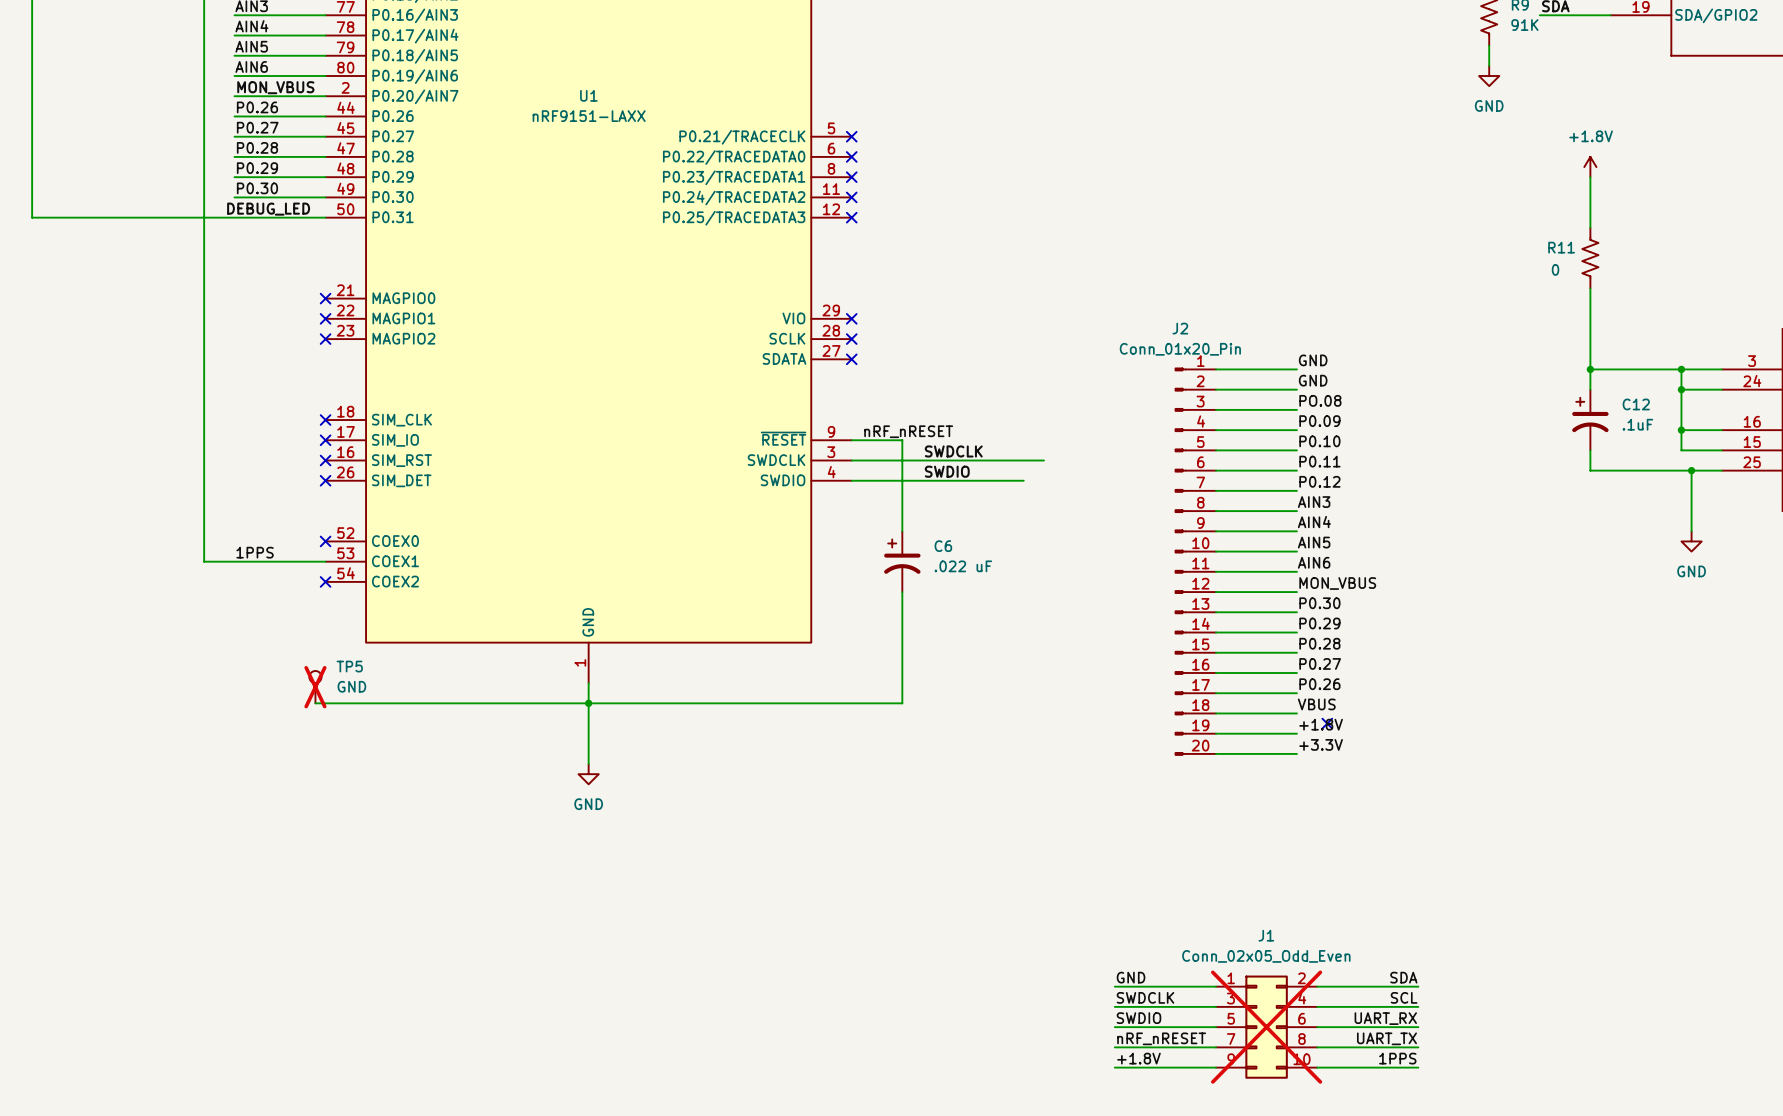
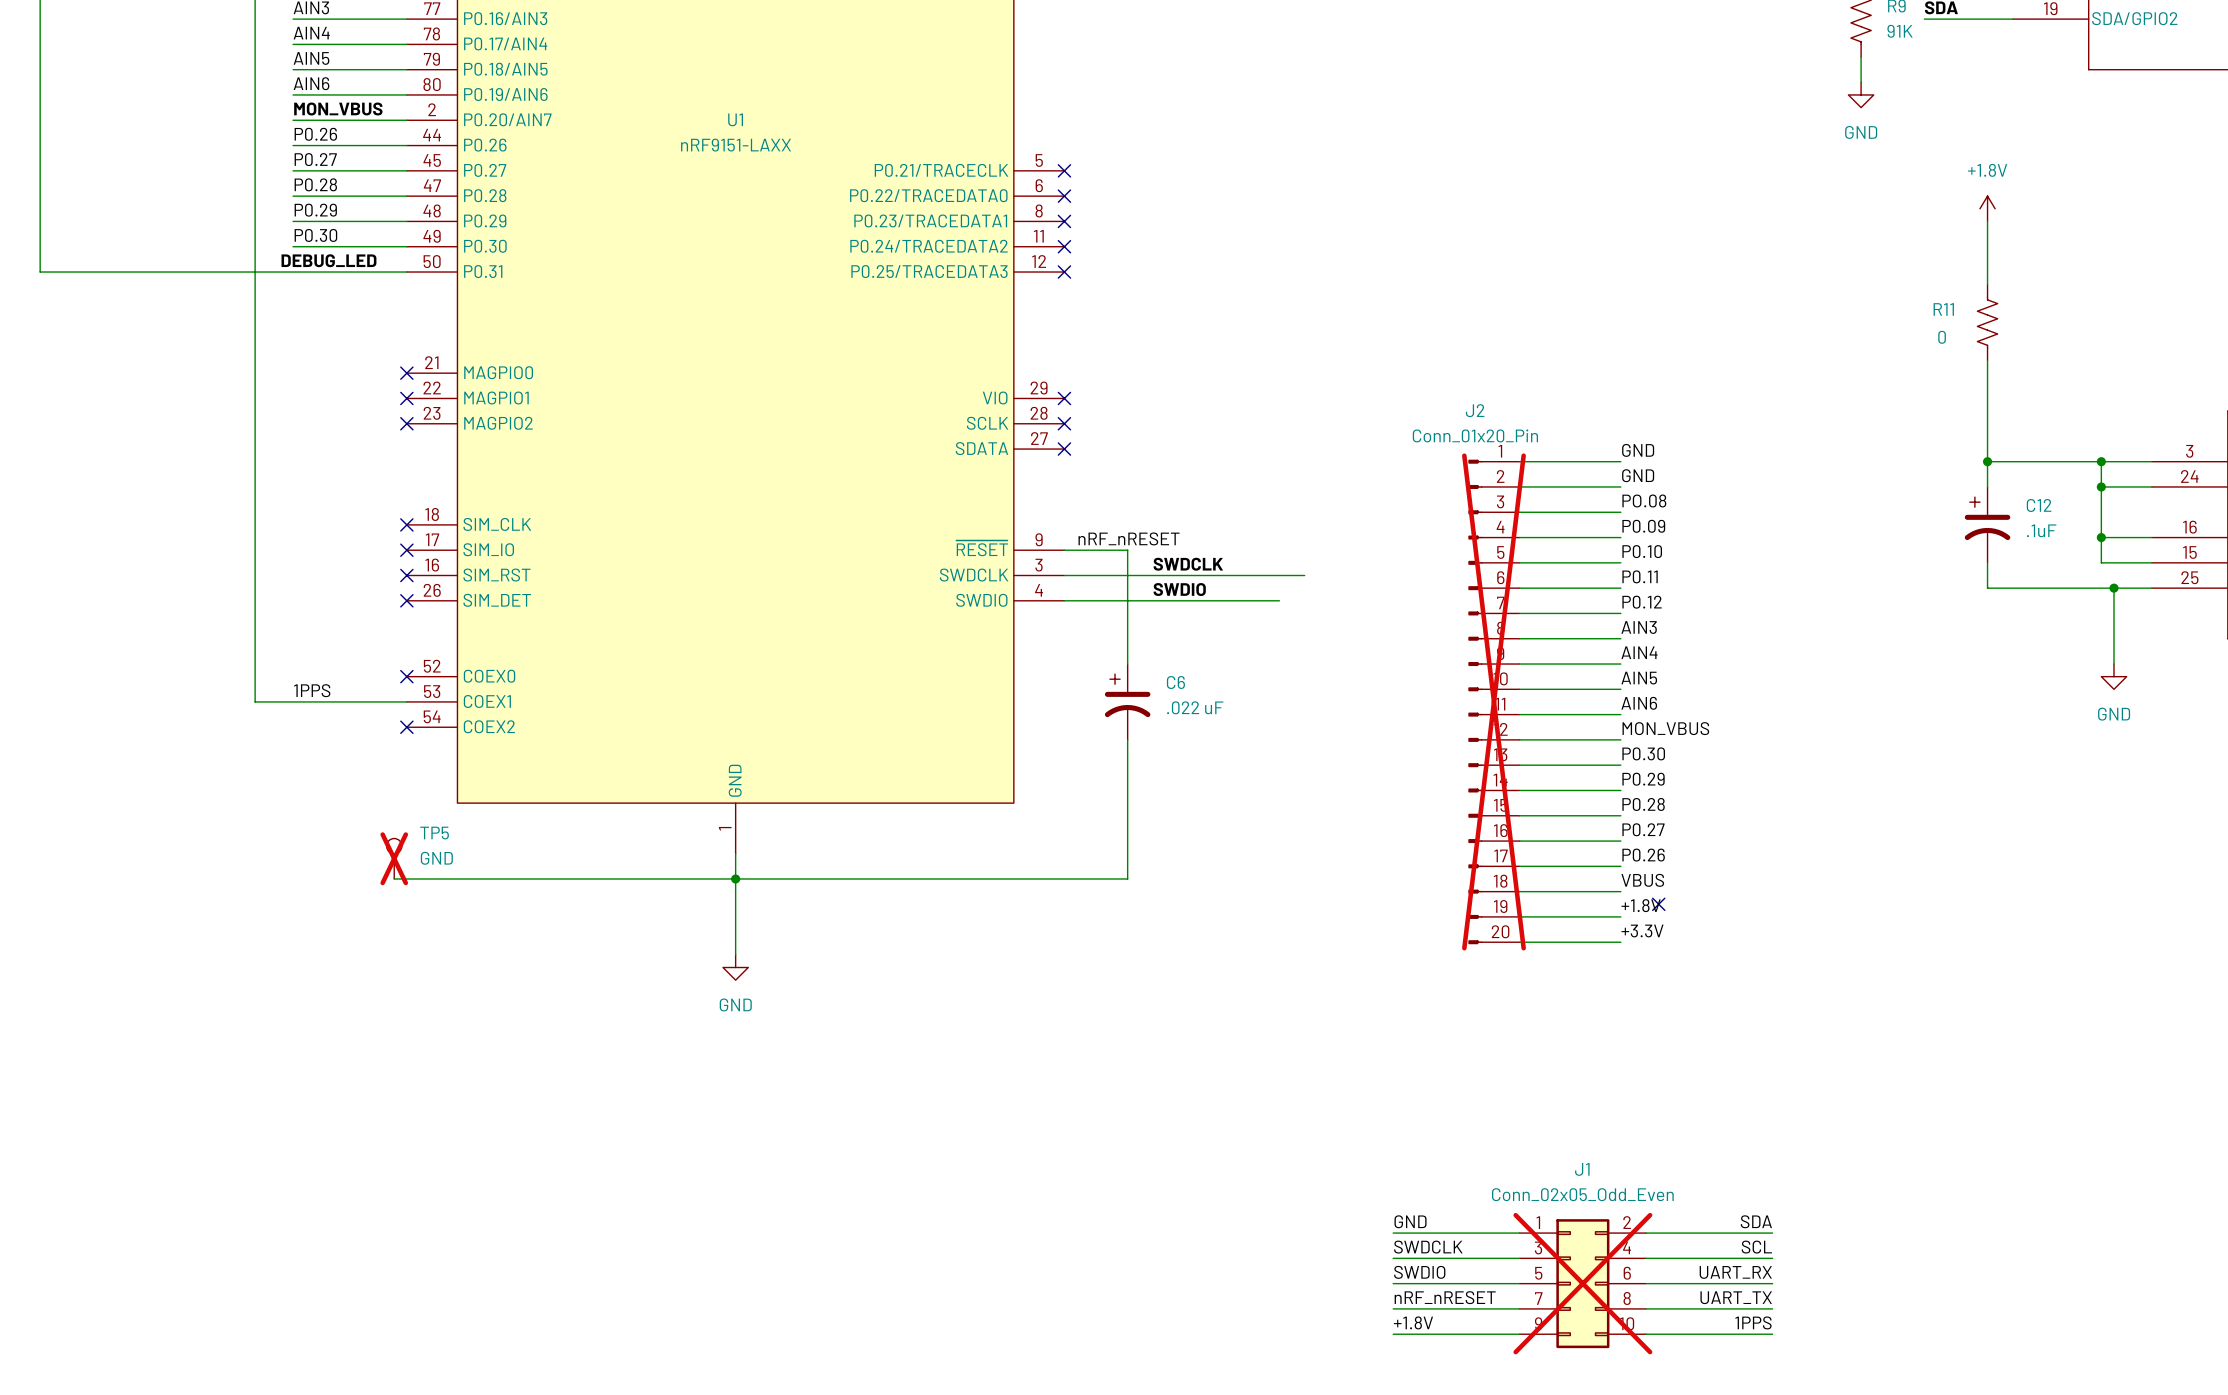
J2 do-not-place cross: none -> (1493, 701)

